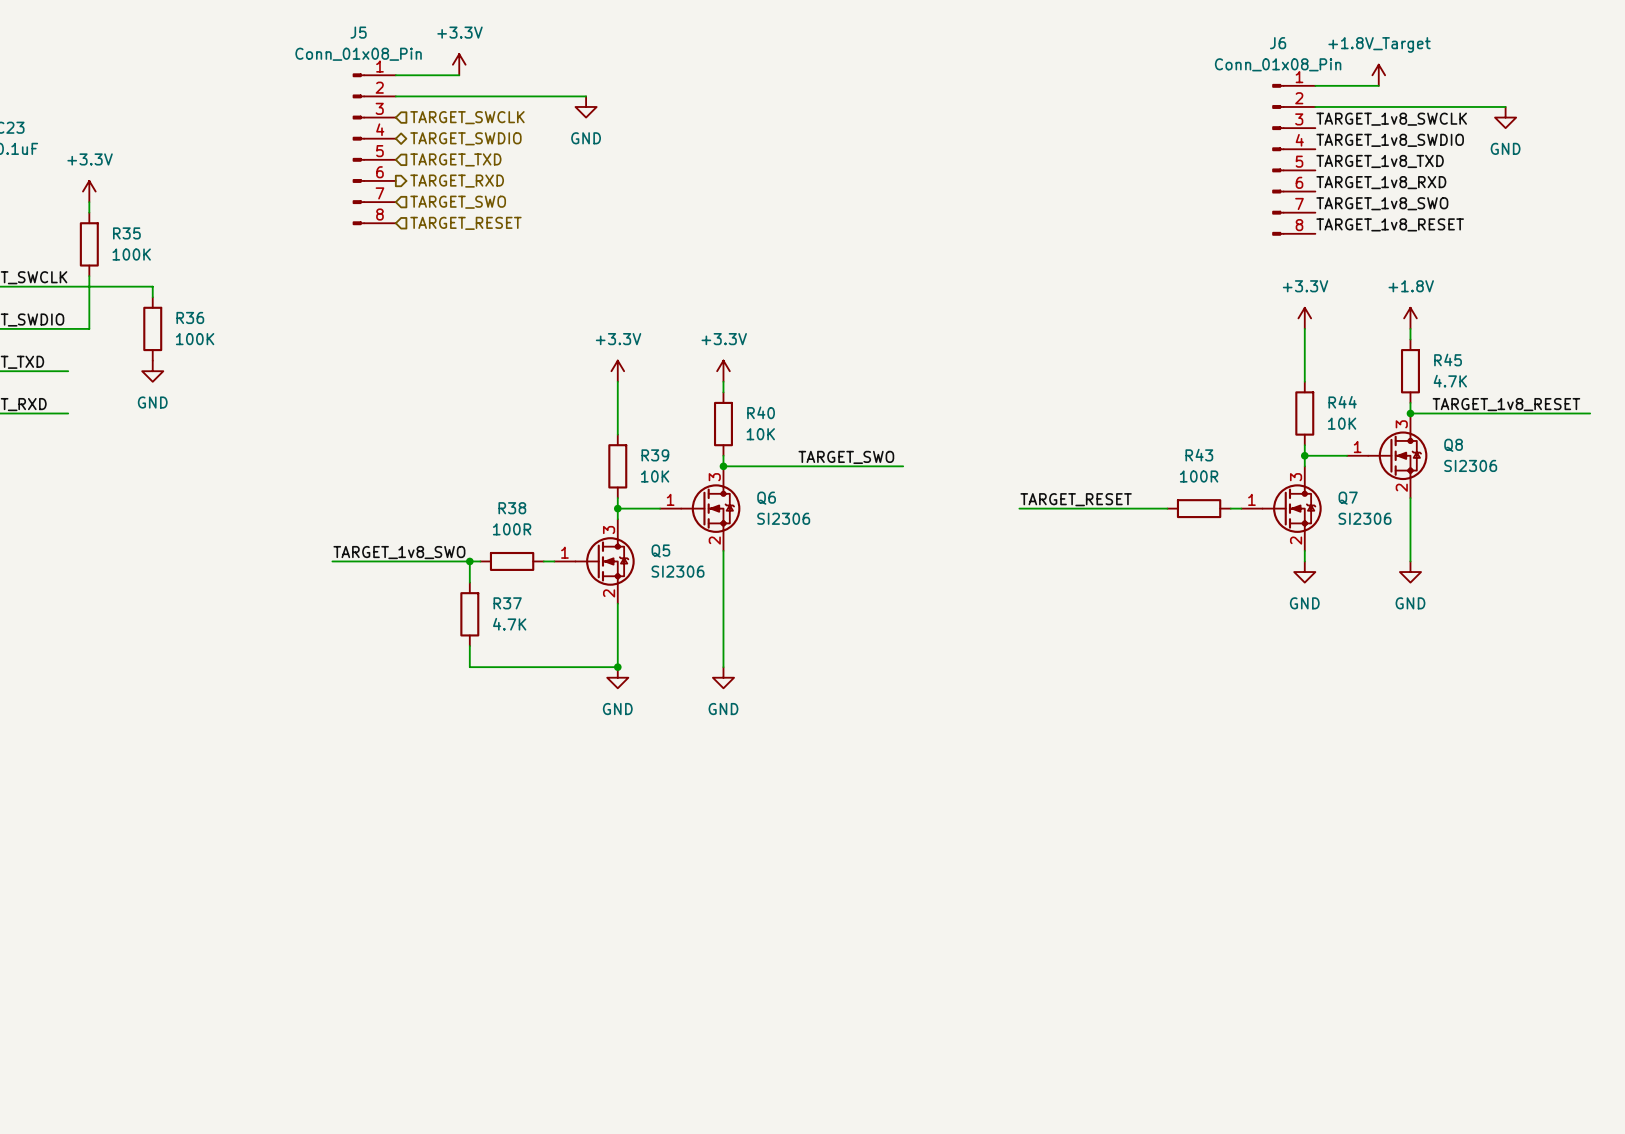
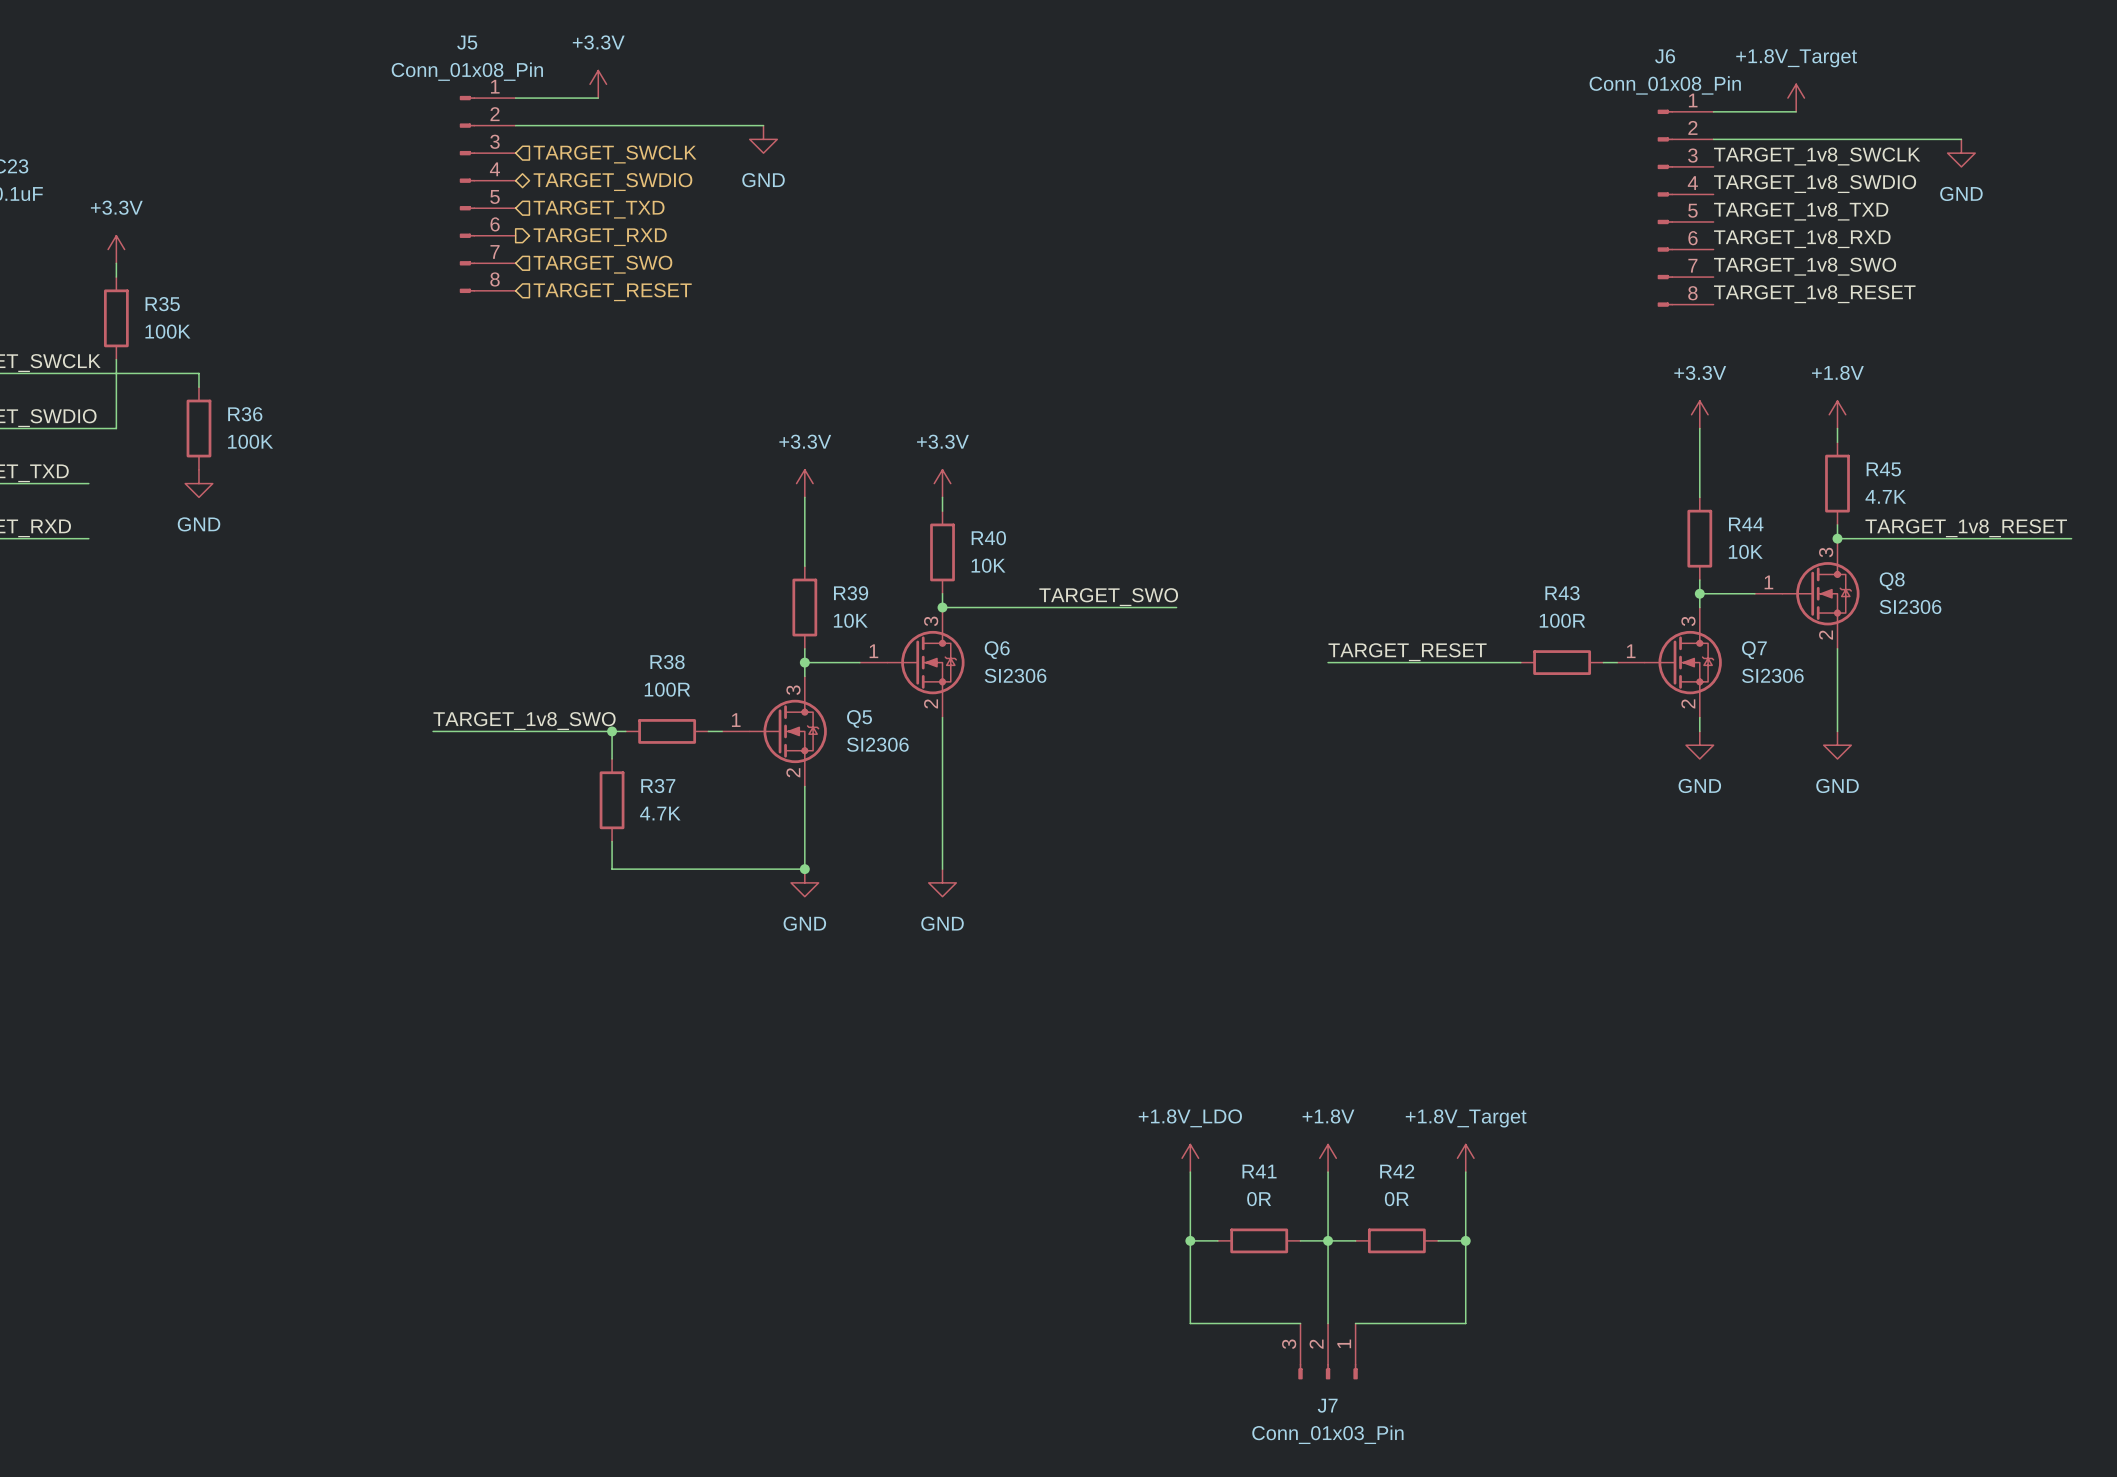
power symbol: none -> +1.8V_LDO (1190, 1158)
power symbol: none -> +1.8V (1328, 1158)
power symbol: none -> +1.8V_Target (1465, 1158)
wire: none -> (1190, 1172) (1190, 1323) (1300, 1323)
wire: none -> (1328, 1172) (1328, 1323)
wire: none -> (1465, 1172) (1465, 1323) (1355, 1323)
wire: none -> (1190, 1240) (1217, 1240)
junction: none -> (1190, 1240)
R41: none -> 0R (1259, 1240)
wire: none -> (1300, 1240) (1355, 1240)
junction: none -> (1328, 1240)
R42: none -> 0R (1396, 1240)
wire: none -> (1438, 1240) (1465, 1240)
junction: none -> (1465, 1240)
J7: none -> Conn_01x03_Pin (1328, 1351)

